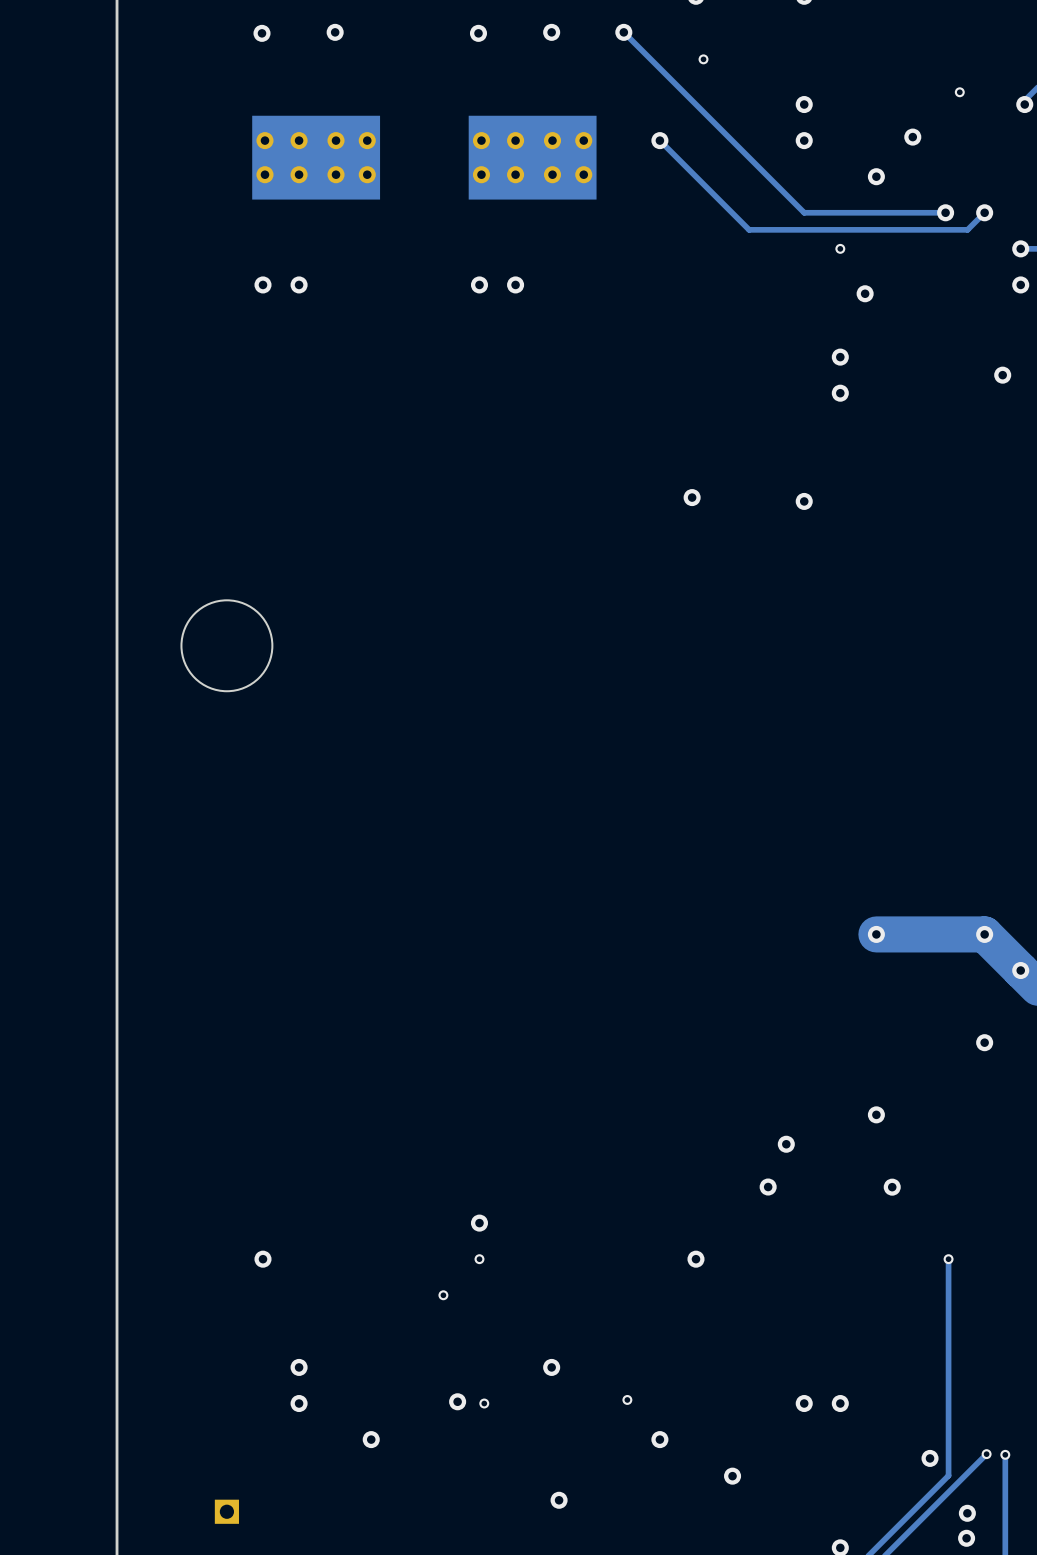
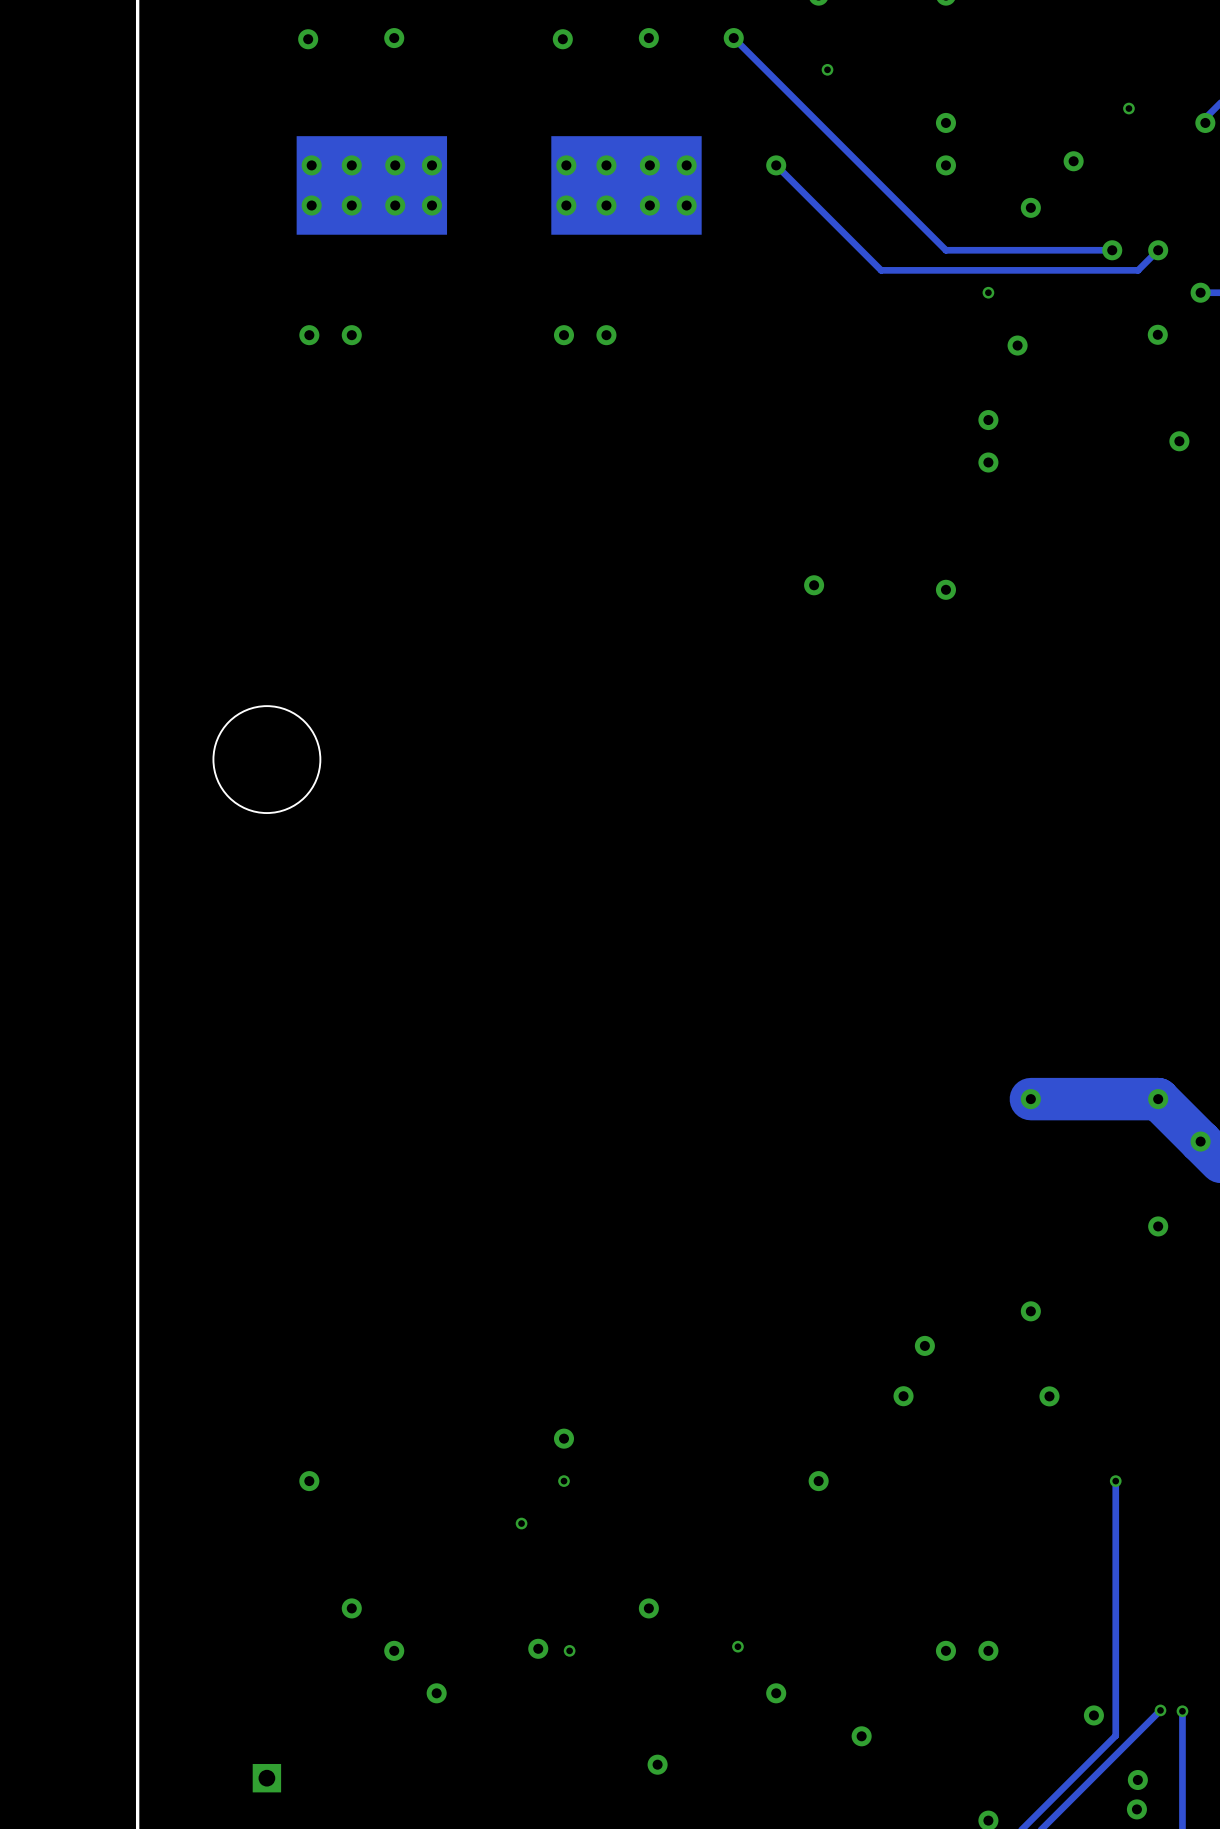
via position: (1020, 284) -> (1157, 334)
via position: (299, 1403) -> (394, 1650)

